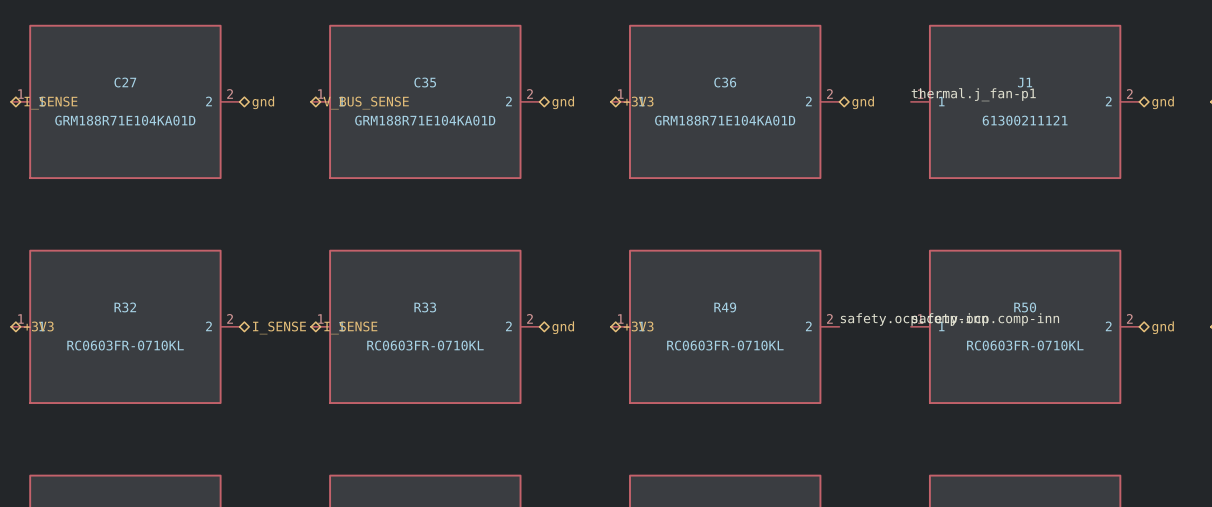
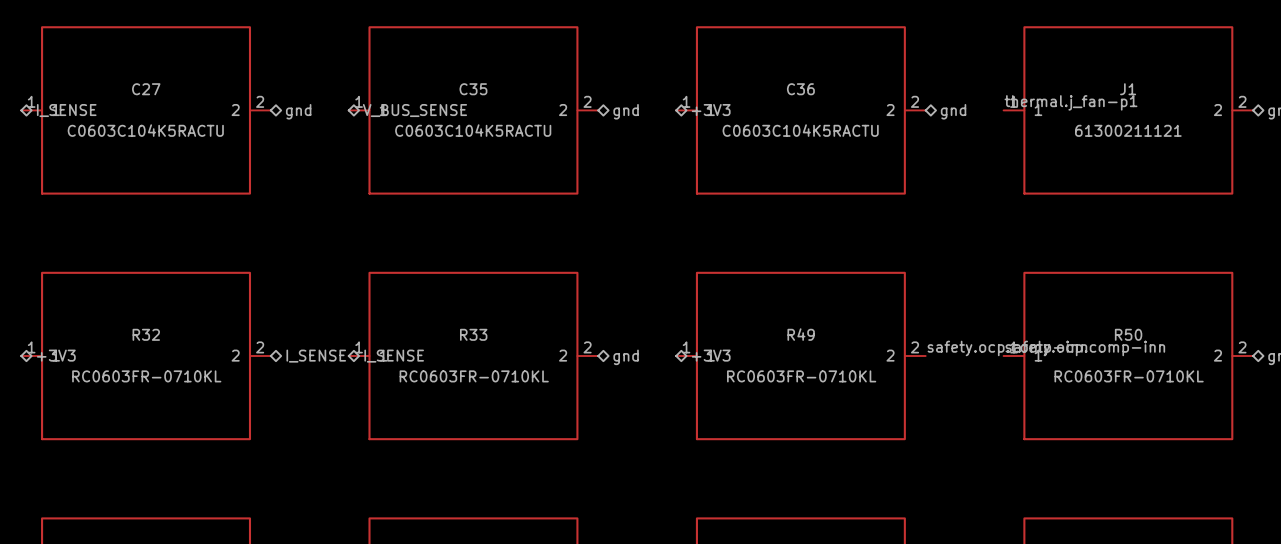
C27 value: GRM188R71E104KA01D (125, 120) -> C0603C104K5RACTU (145, 130)
C35 value: GRM188R71E104KA01D (425, 120) -> C0603C104K5RACTU (473, 130)
C36 value: GRM188R71E104KA01D (725, 120) -> C0603C104K5RACTU (800, 130)

